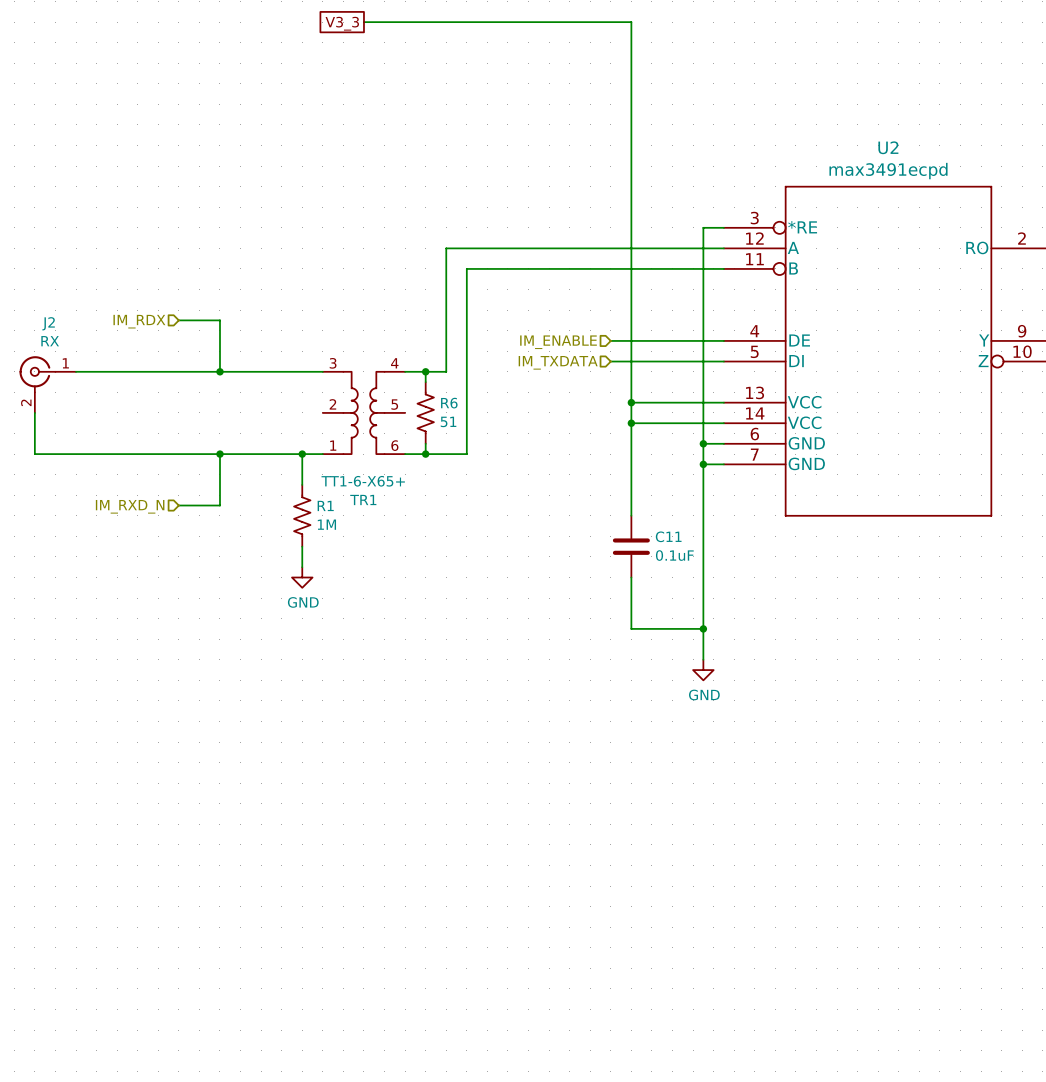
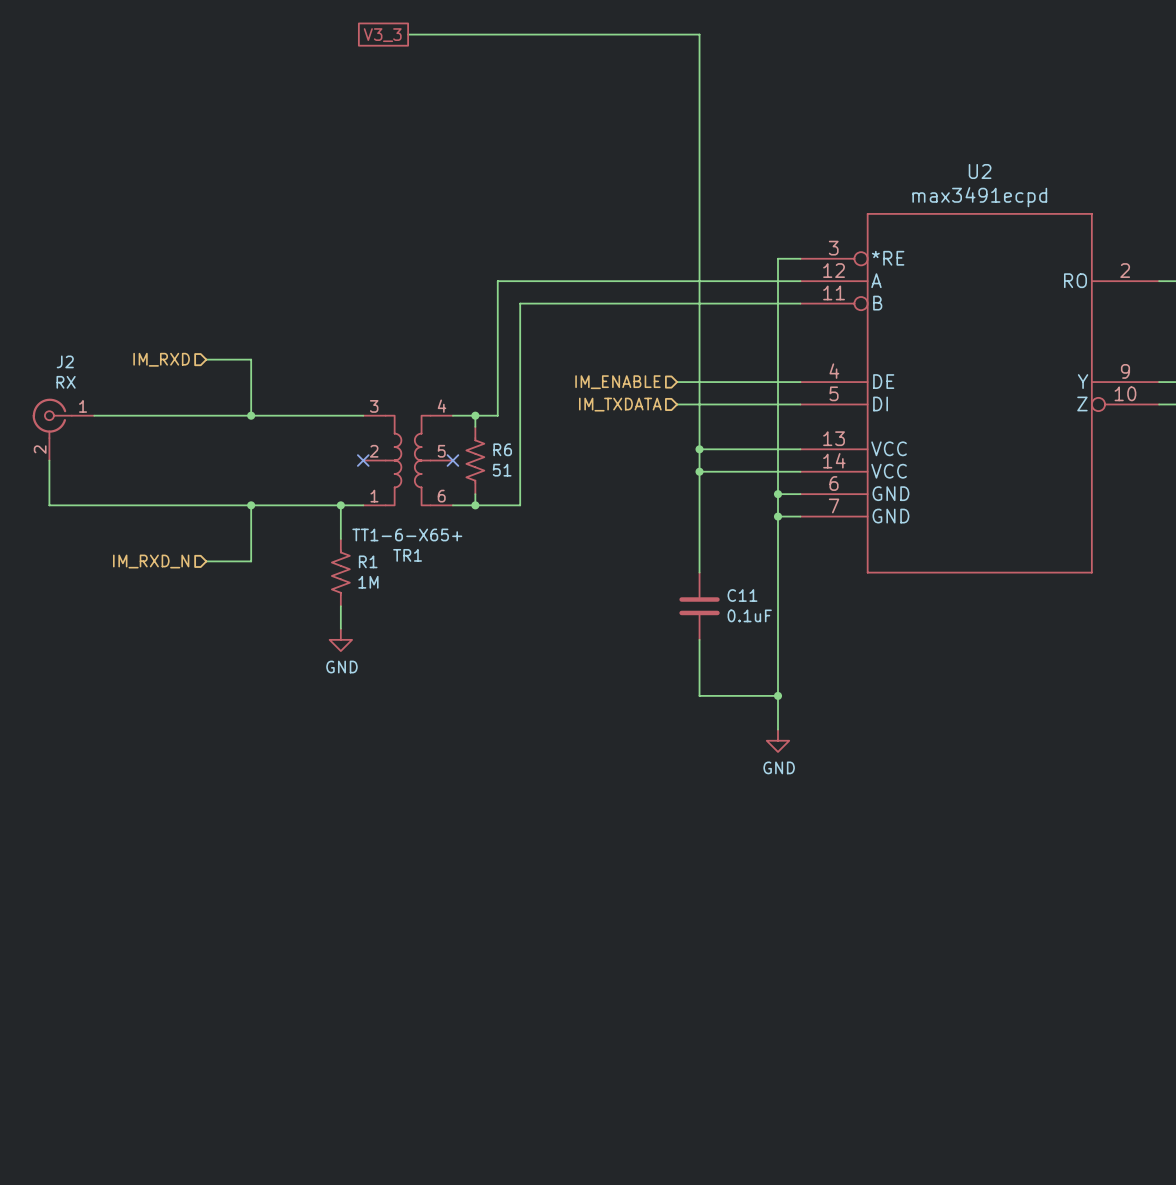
hierarchical label: IM_RDX (139, 321) -> IM_RXD (161, 359)
no-connect mark: none -> (363, 460)
no-connect mark: none -> (452, 460)

